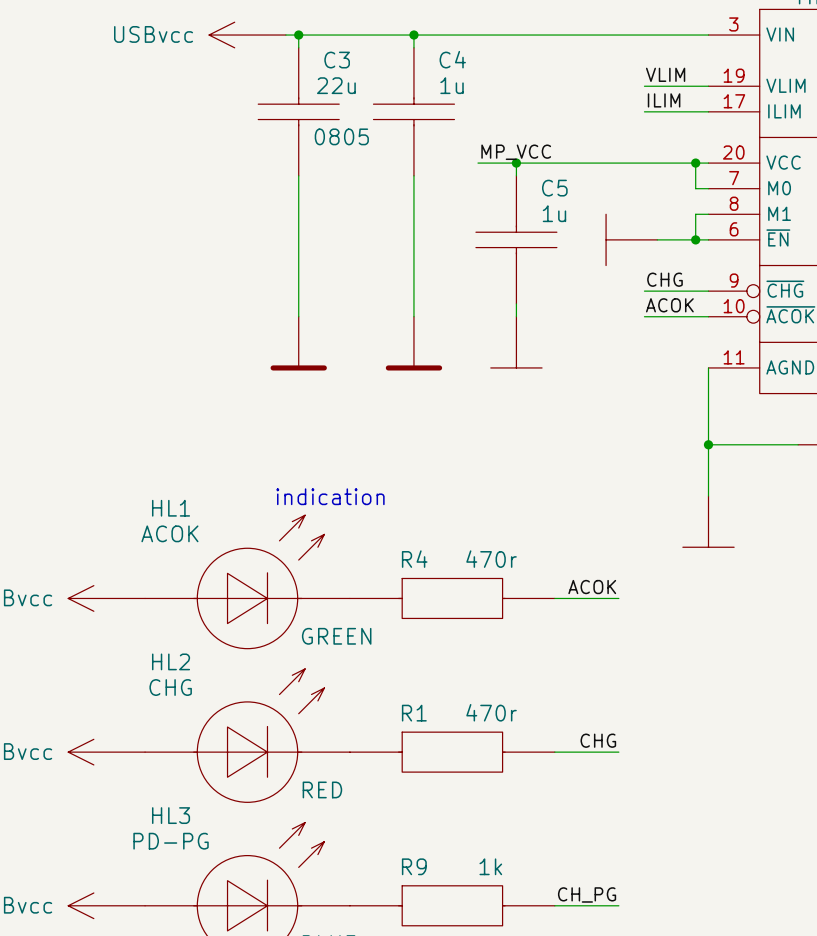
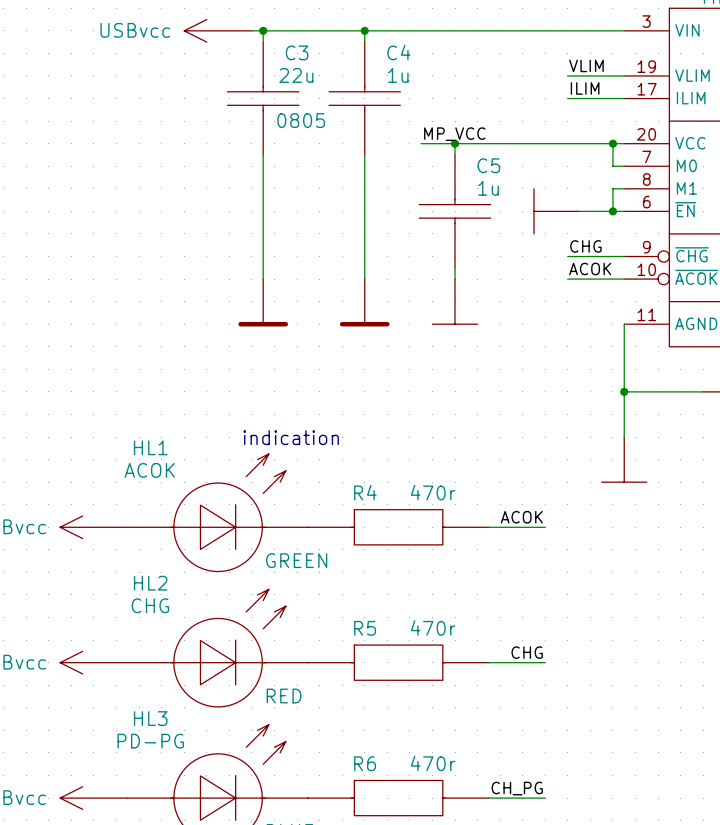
R1 name: R1 (414, 713) -> R5 (365, 628)
R9 name: R9 (414, 866) -> R6 (365, 763)
R9 value: 1k (490, 866) -> 470r (433, 763)

